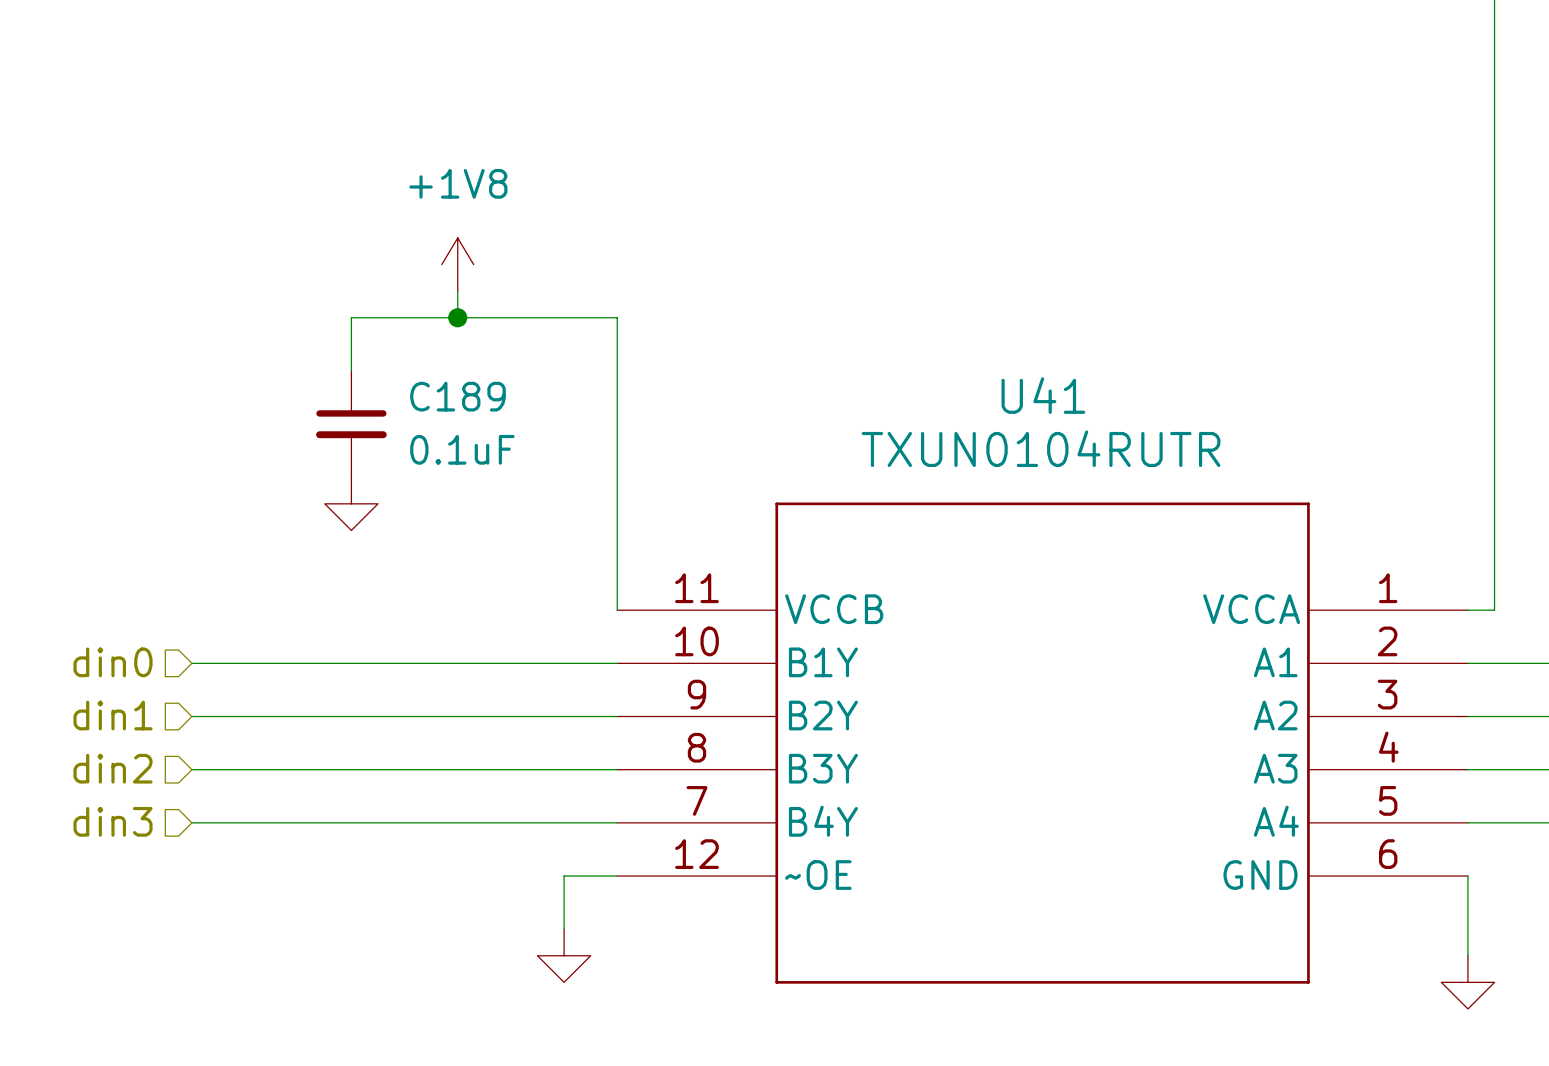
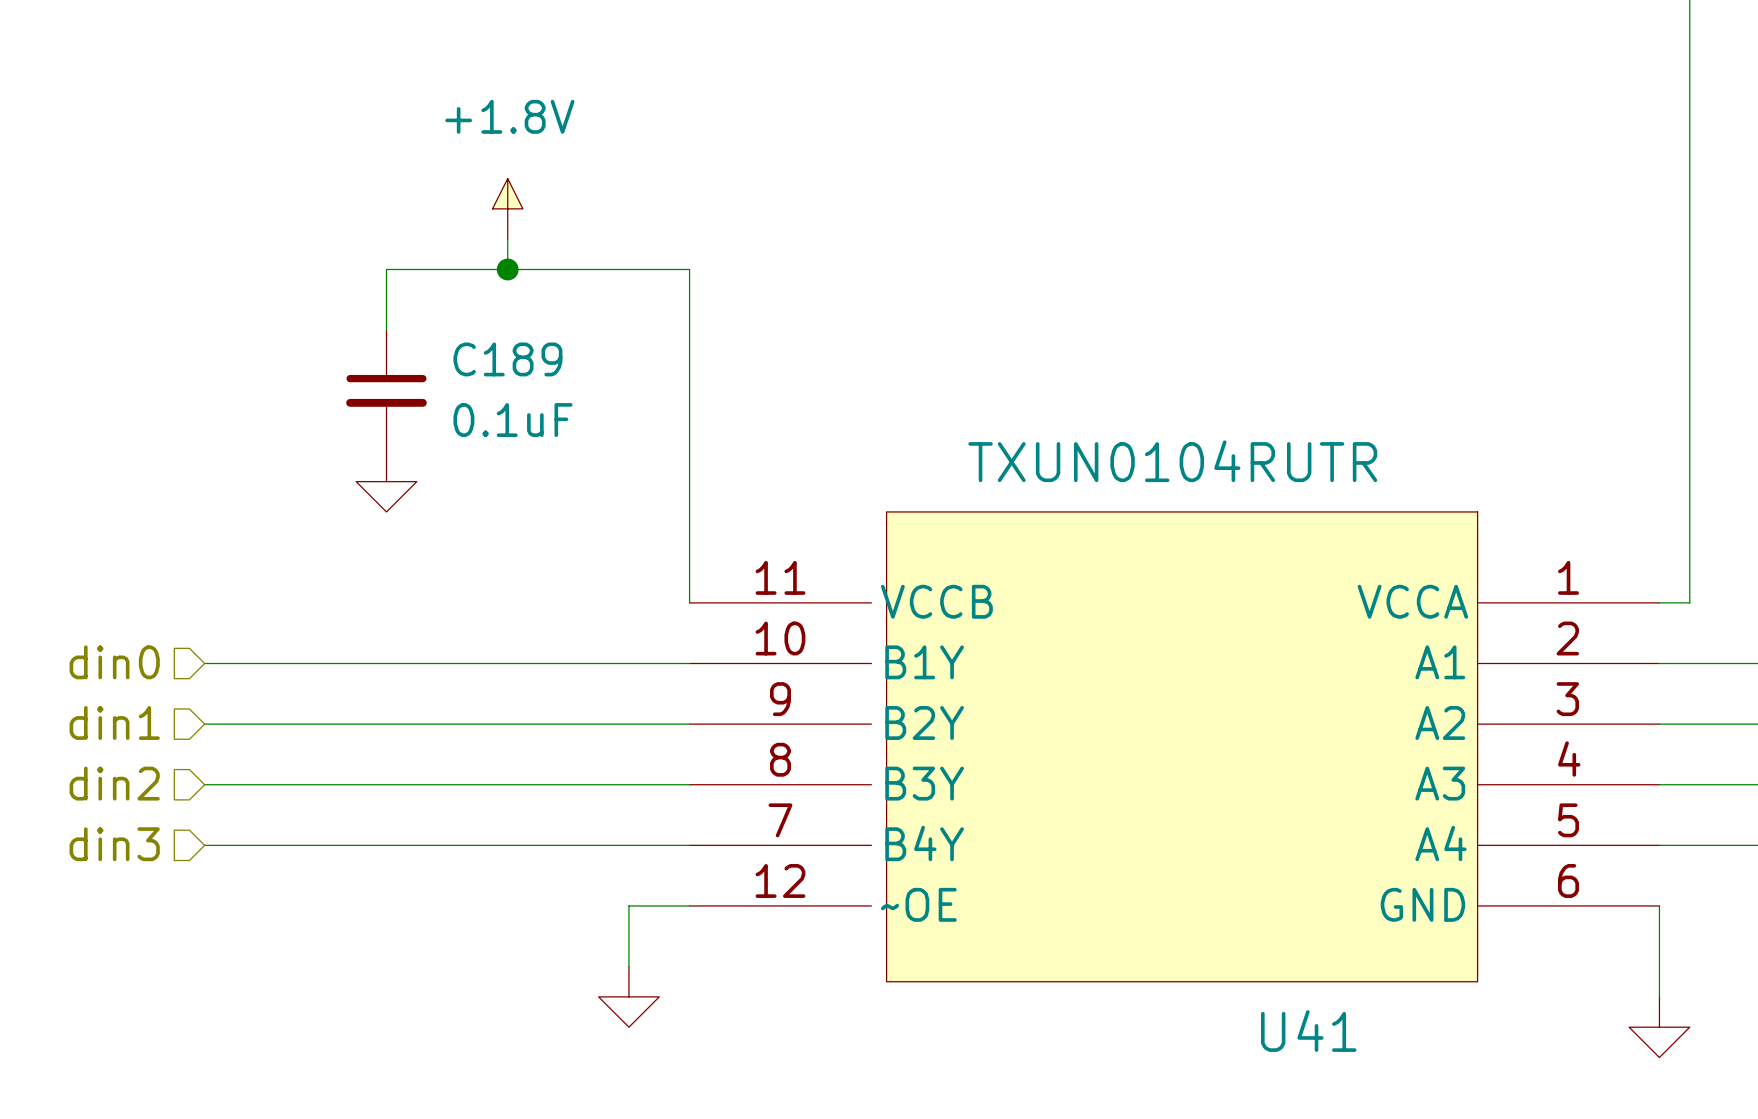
power symbol: +1V8 (457, 264) -> +1.8V (507, 208)
U41 name position: U41 (1043, 395) -> U41 (1308, 1031)
U41 value position: TXUN0104RUTR (1041, 448) -> TXUN0104RUTR (1172, 461)
U41 symbol: [617, 502, 1468, 984] -> [689, 511, 1660, 982]

